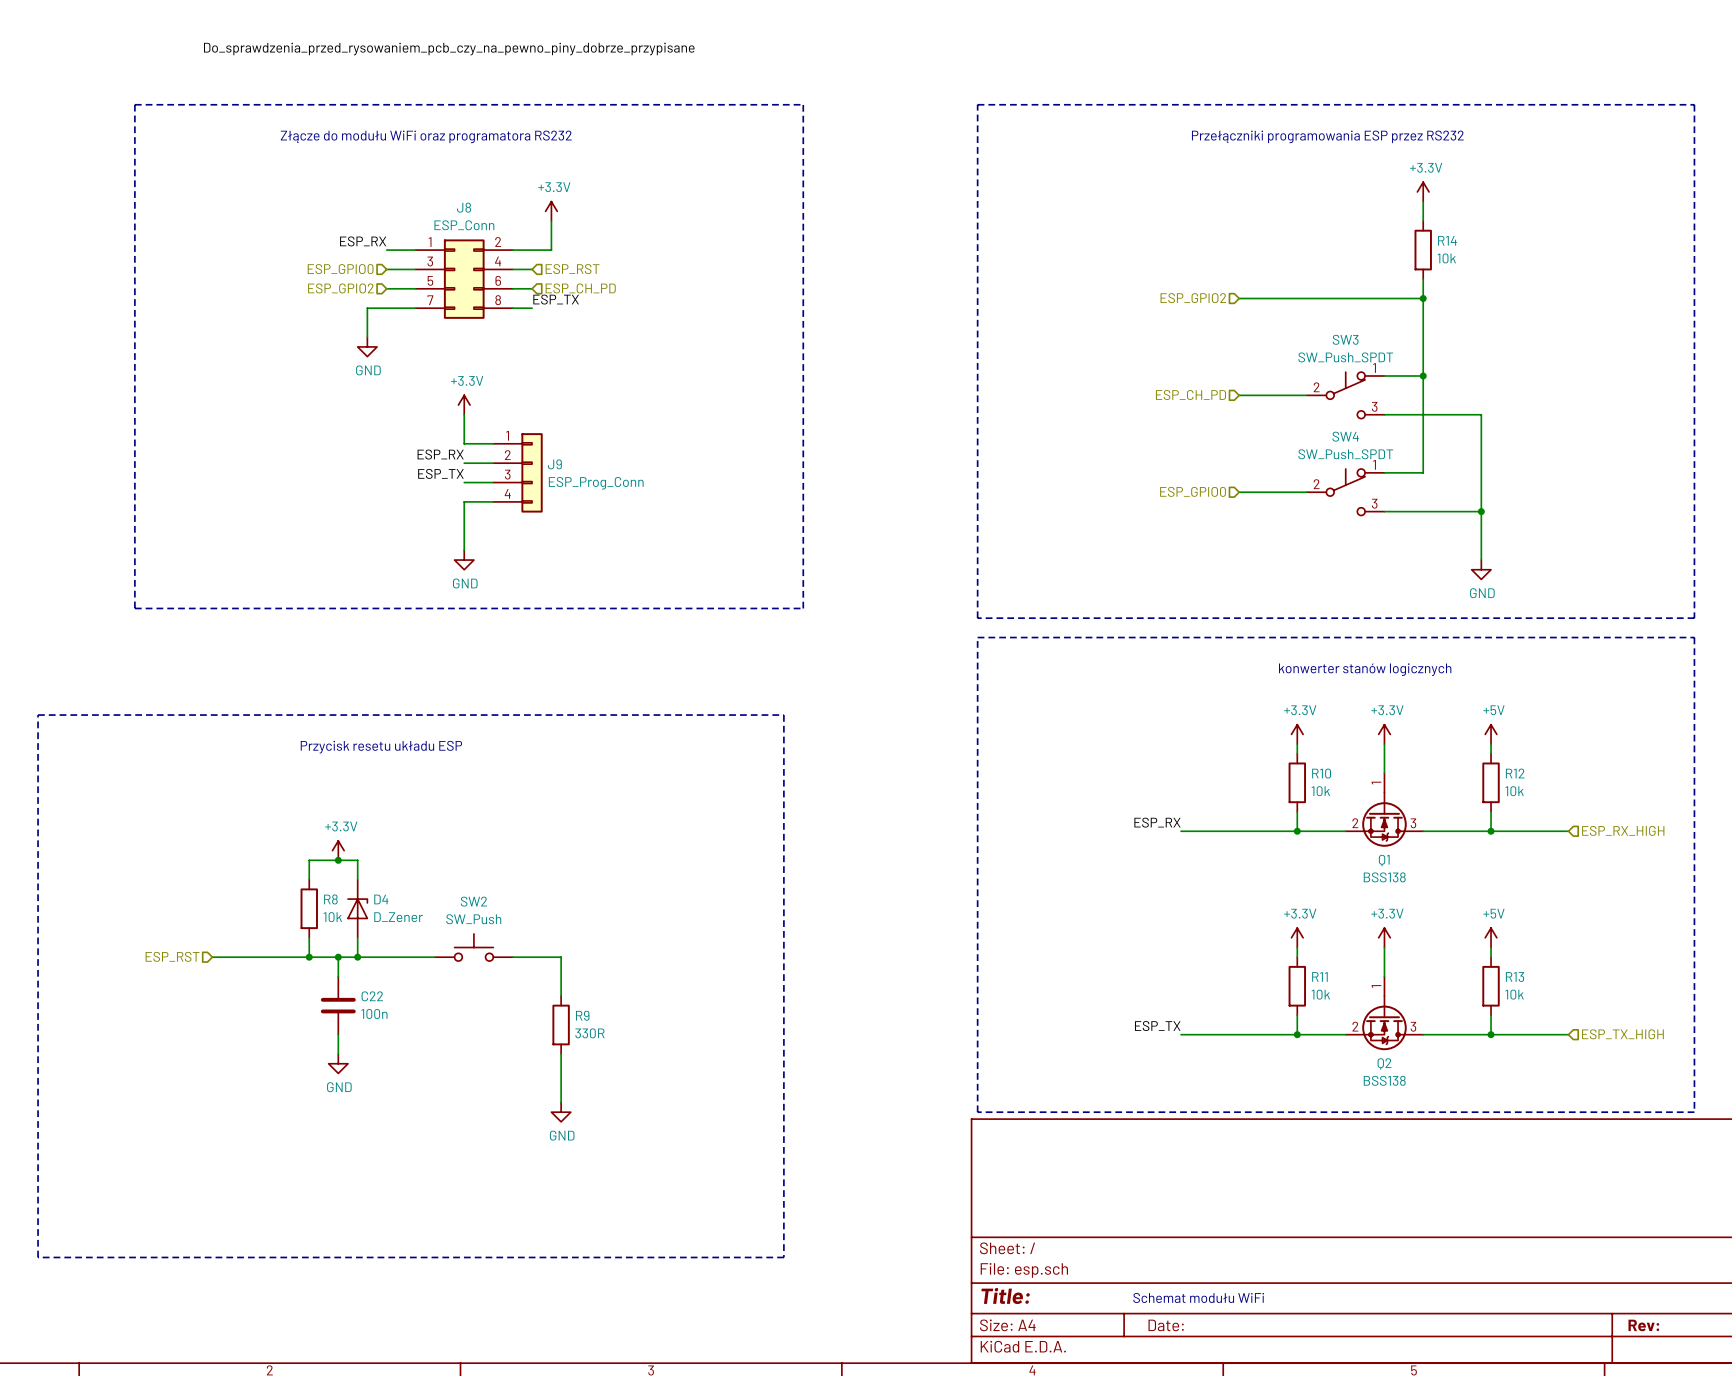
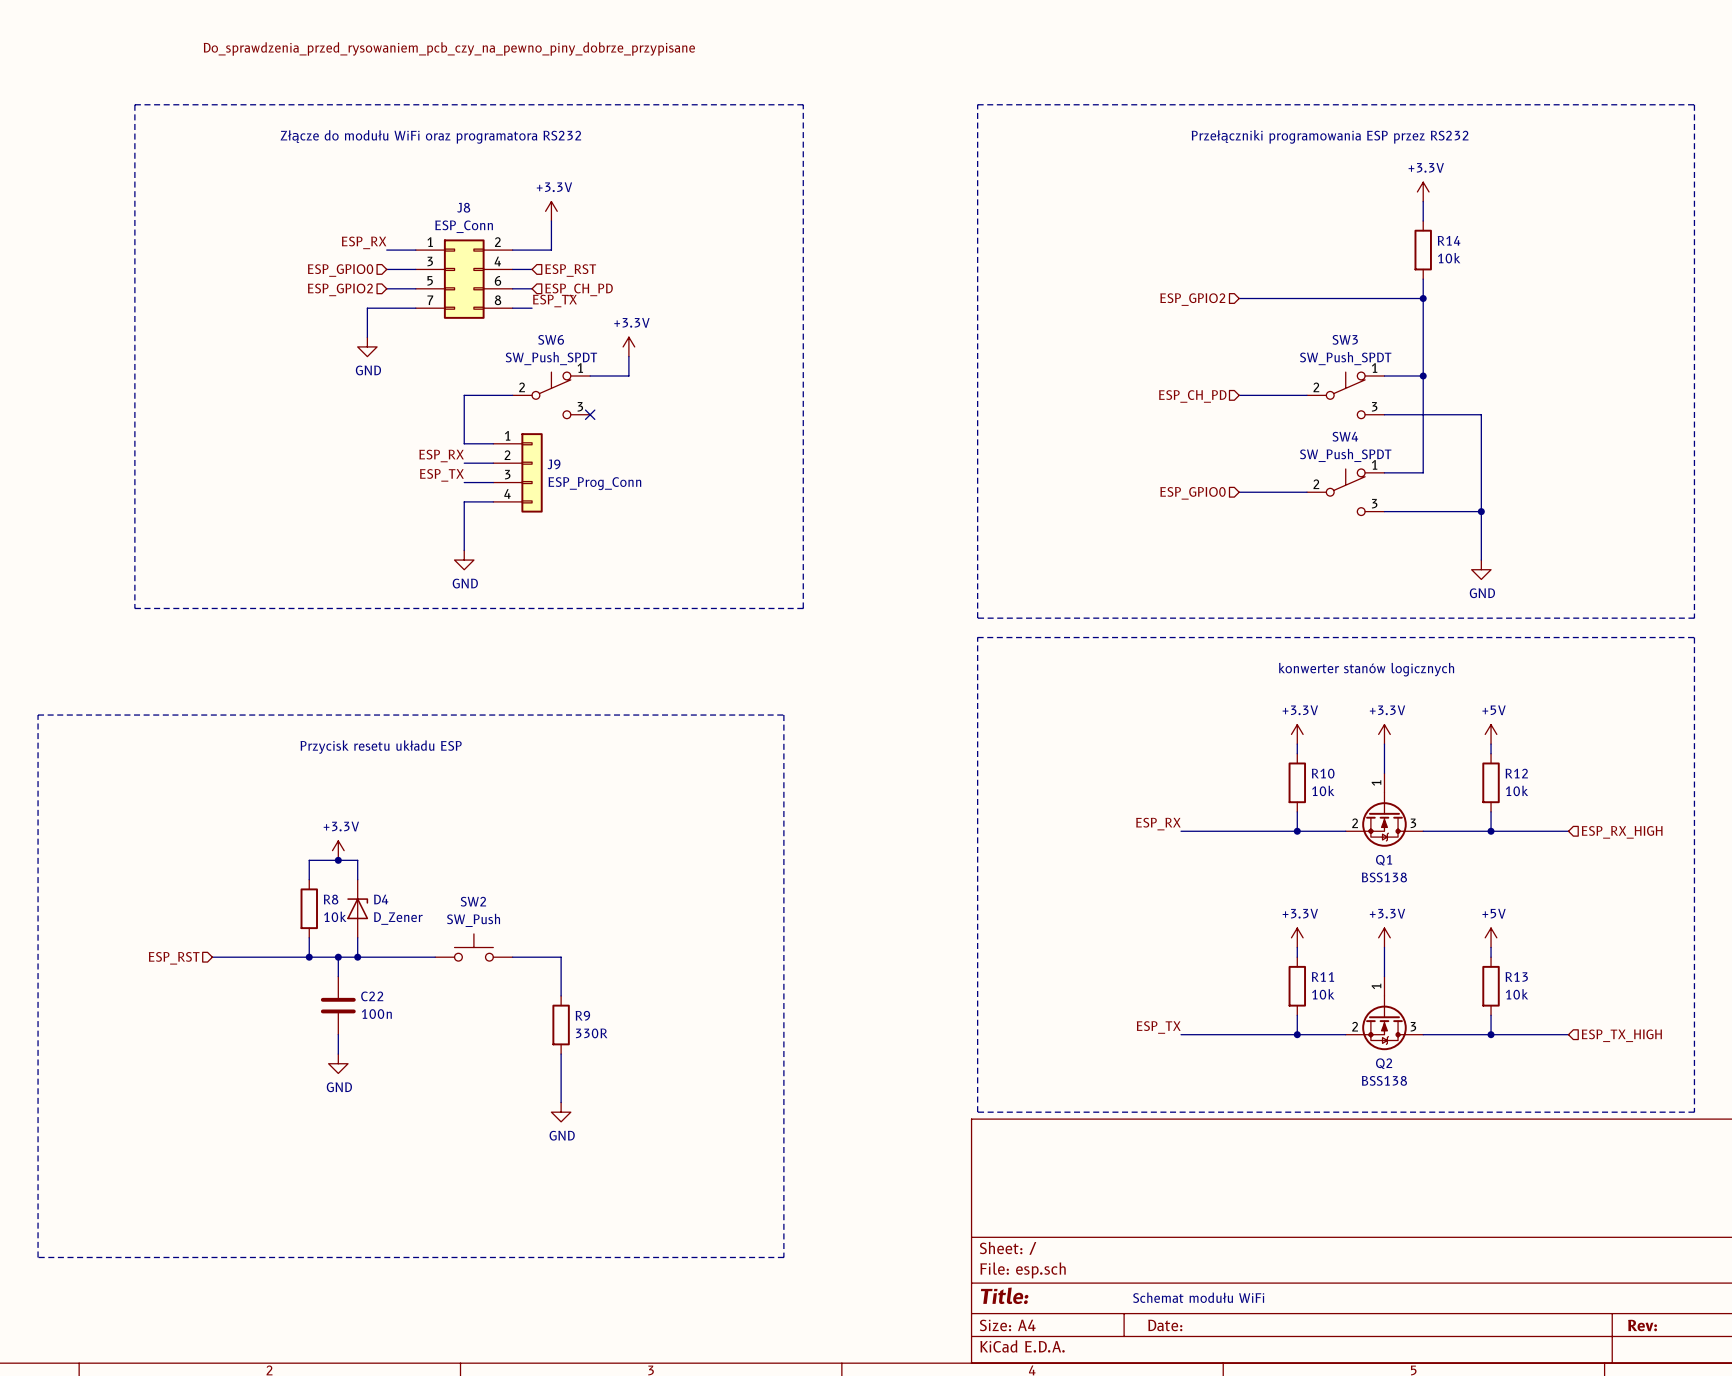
wire: none -> (628, 356) (628, 376) (590, 376)
wire: none -> (512, 395) (464, 395) (464, 414)
SW6: none -> SW_Push_SPDT (551, 395)
power symbol position: +3.3V (464, 405) -> +3.3V (628, 346)
no-connect mark: none -> (590, 414)

